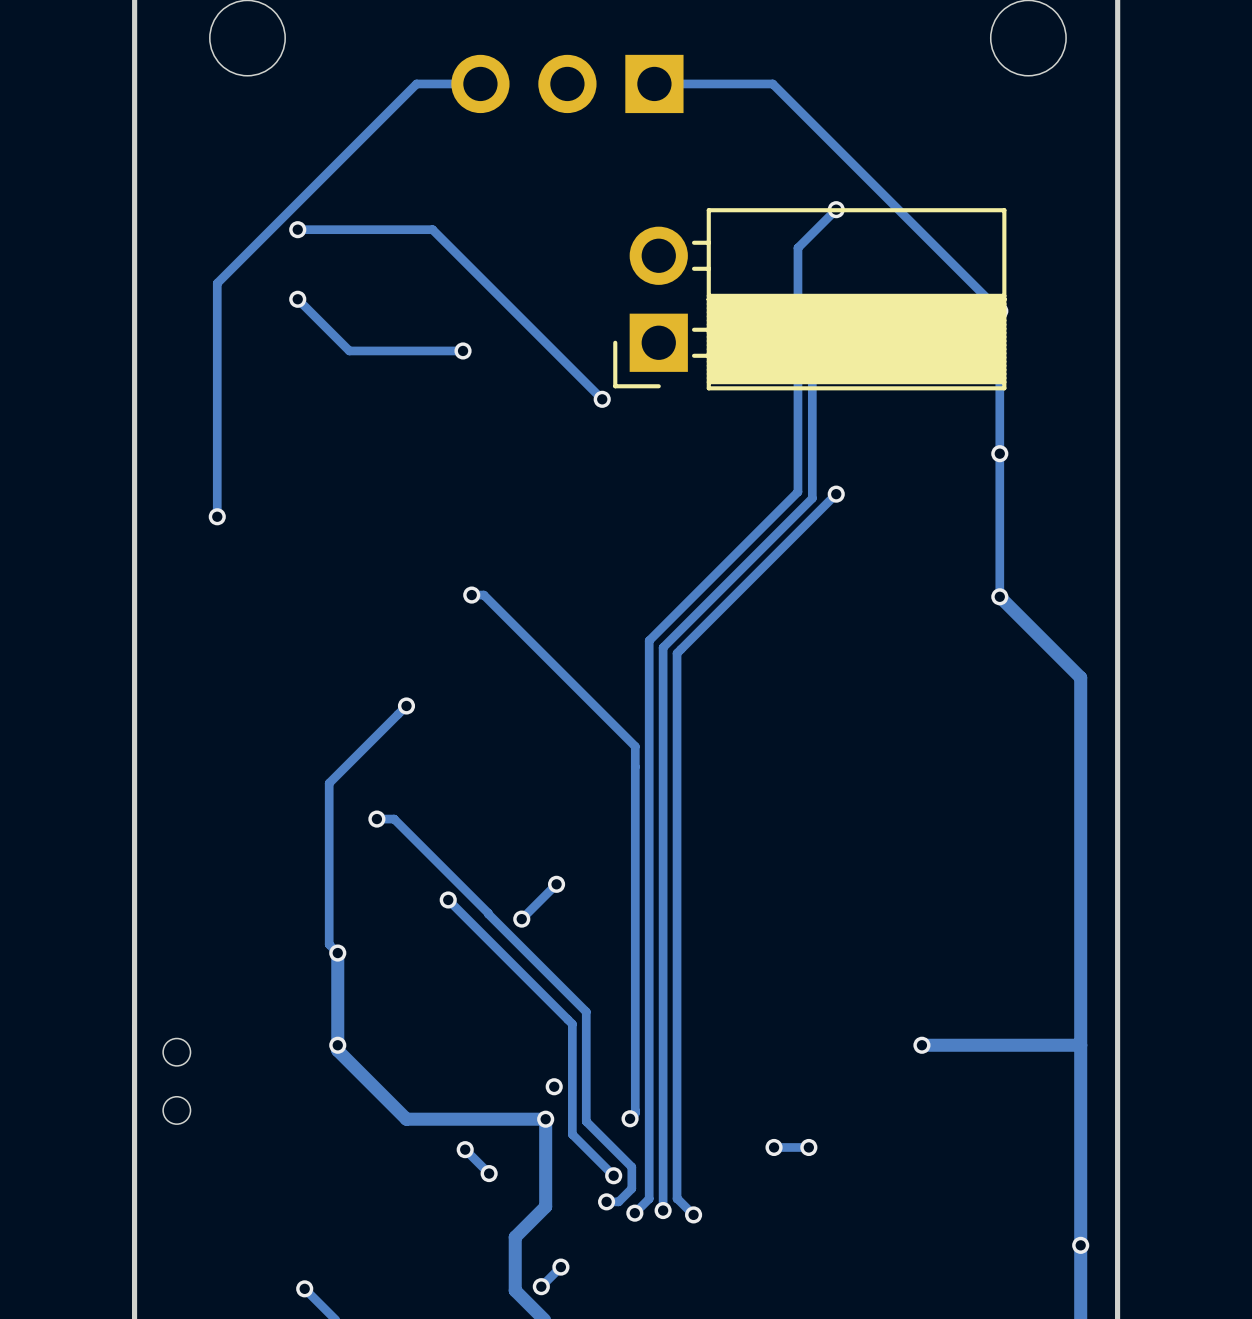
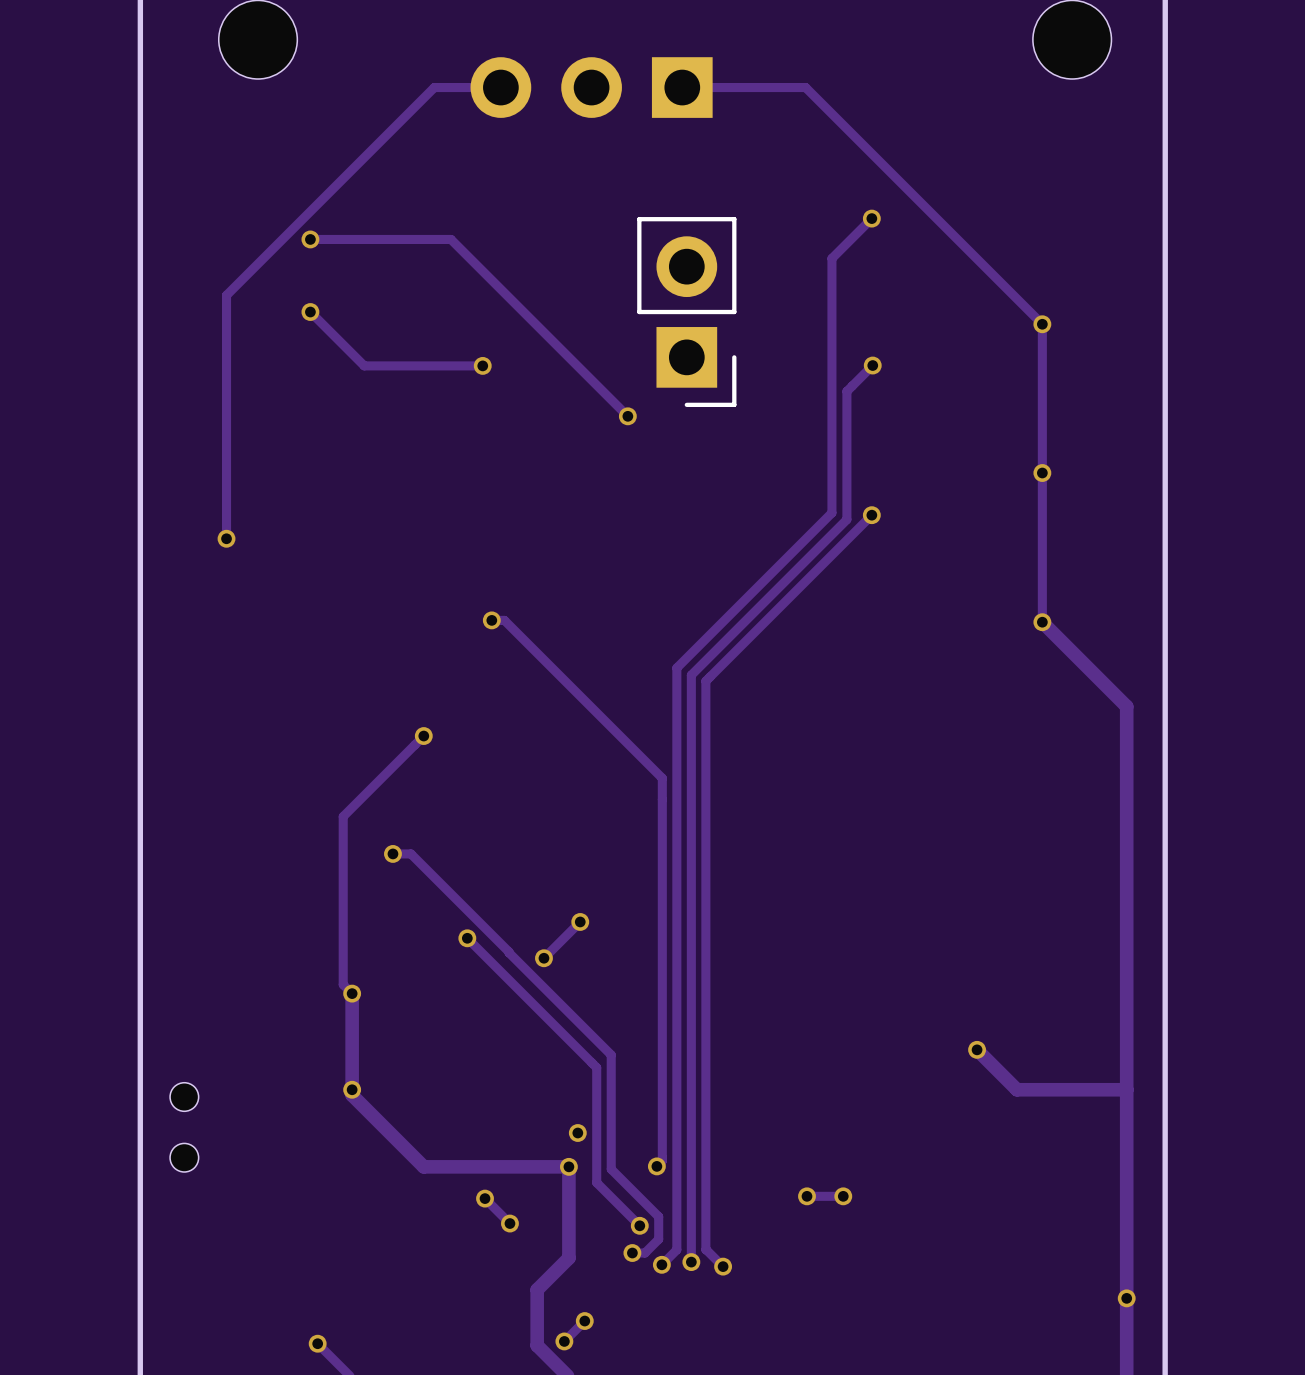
part: none -> (686, 312)
part: (809, 299) -> none
via position: (921, 1045) -> (977, 1049)
track: (975, 1045) (921, 1045) -> (1016, 1089) (977, 1049)

